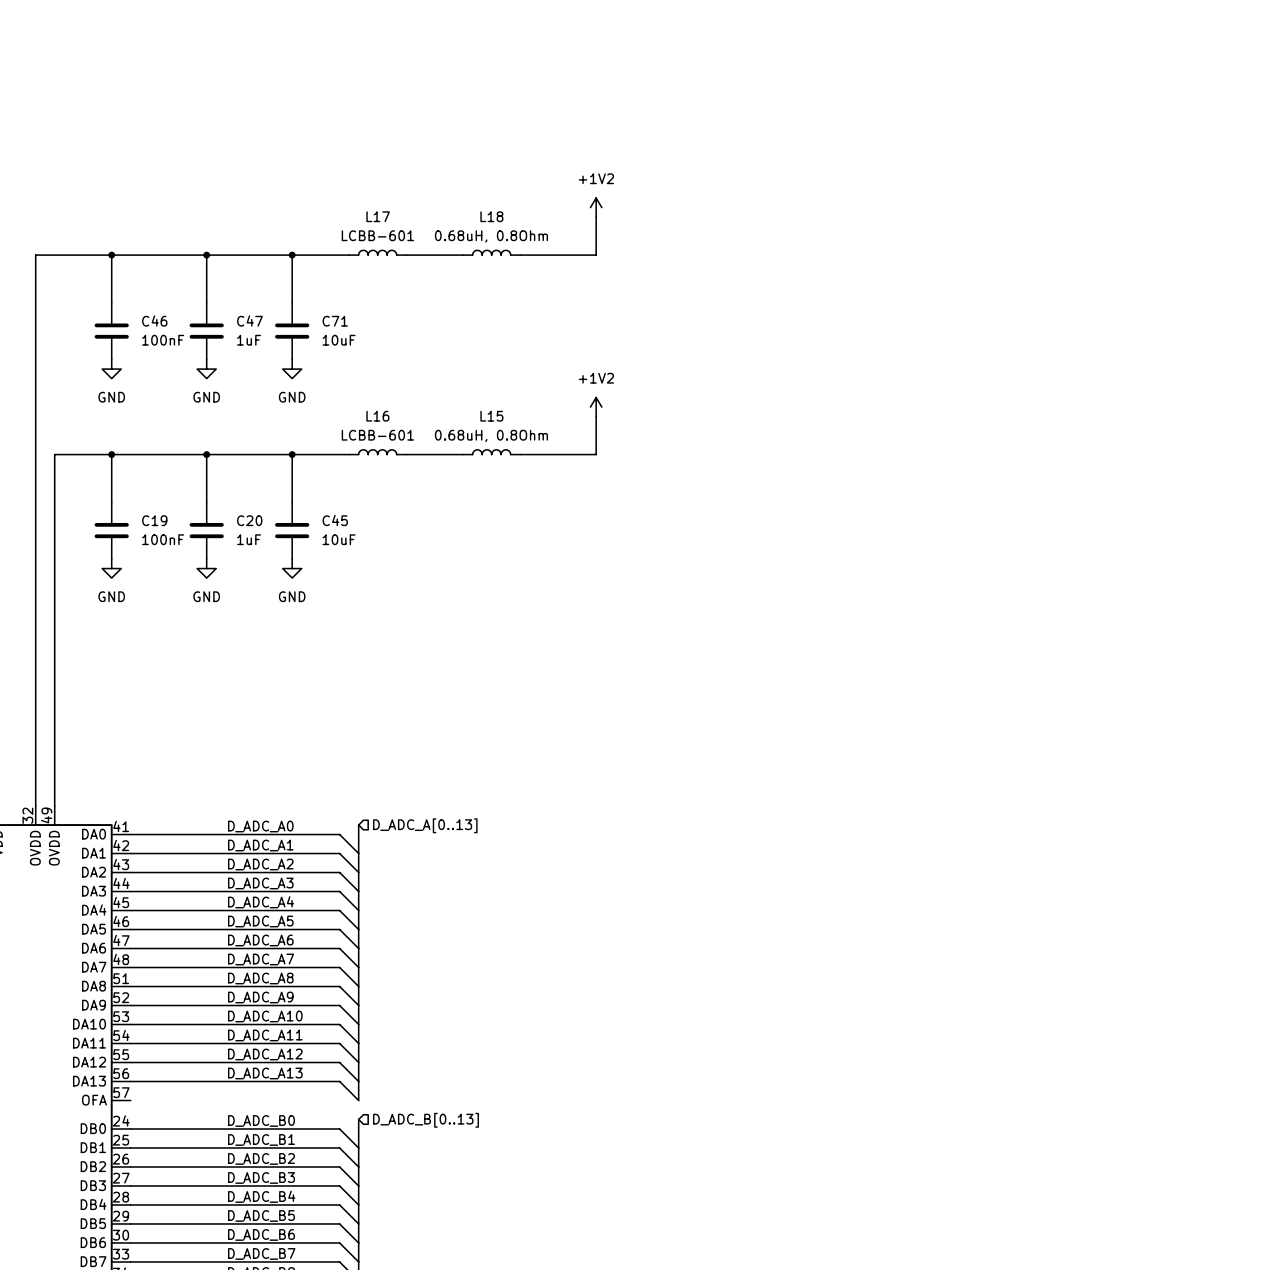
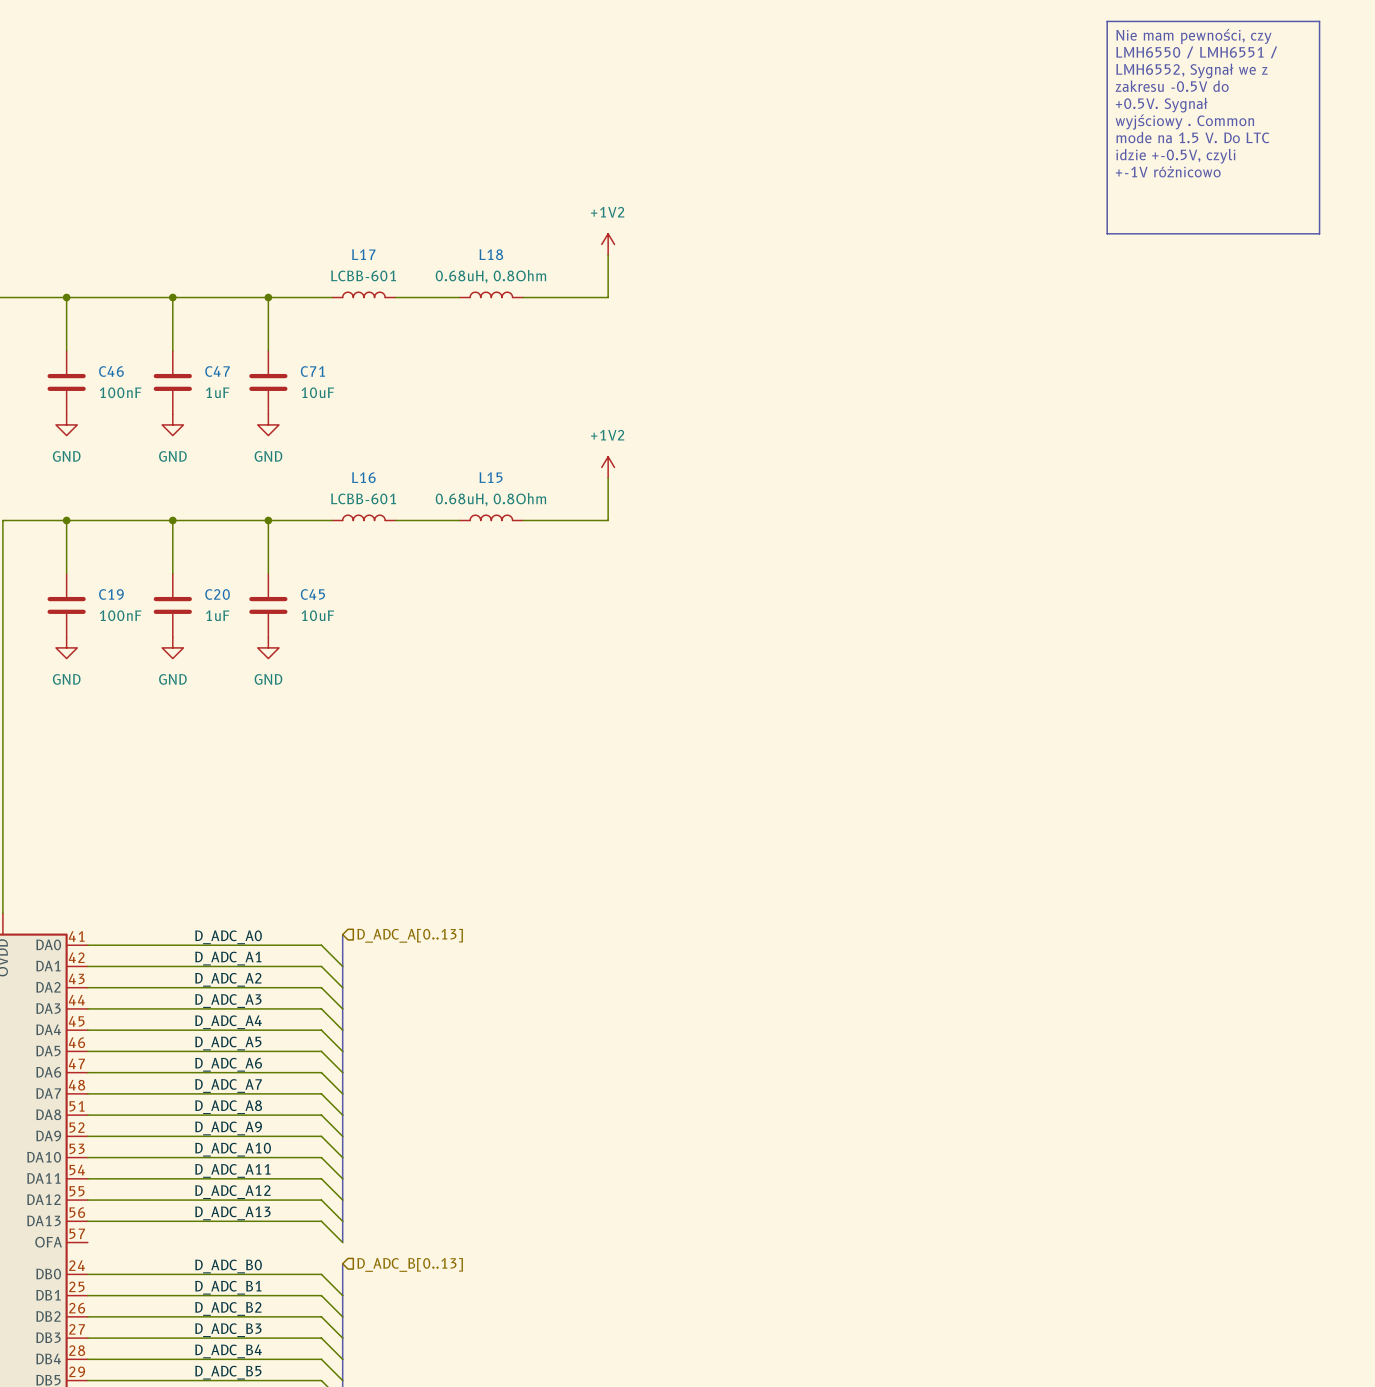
line: none -> (1107, 21) (1319, 21) (1319, 233) (1107, 233) (1107, 21)
text: none -> Nie mam pewności, czy (1193, 36)
text: none -> LMH6550 / LMH6551 / (1196, 52)
text: none -> LMH6552, Sygnał we z (1192, 71)
text: none -> zakresu -0.5V do (1172, 86)
text: none -> +0.5V. Sygnał (1161, 105)
text: none -> wyjściowy . Common (1184, 121)
text: none -> mode na 1.5 V. Do LTC (1192, 137)
text: none -> idzie +-0.5V, czyli (1175, 156)
text: none -> +-1V różnicowo (1168, 171)

